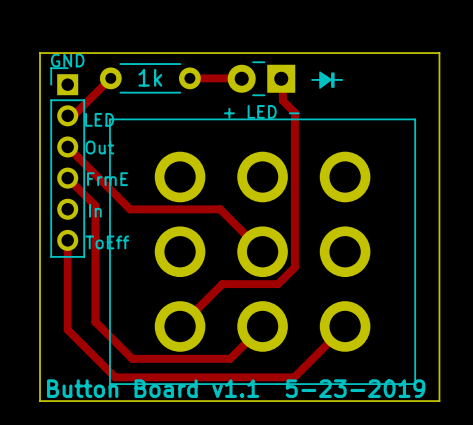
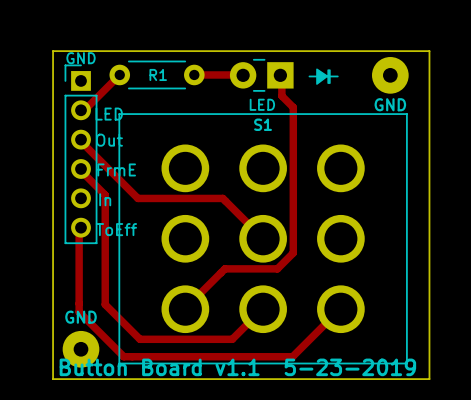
part footprint: [50, 67, 86, 258] -> [64, 64, 98, 245]
R1 value: 1k (150, 77) -> none
R1 name: none -> R1 (158, 74)
GND: none -> (390, 75)
part value: + LED - (261, 111) -> LED (262, 104)
part: (262, 251) -> none
S1: none -> (263, 238)
GND: none -> (81, 349)

